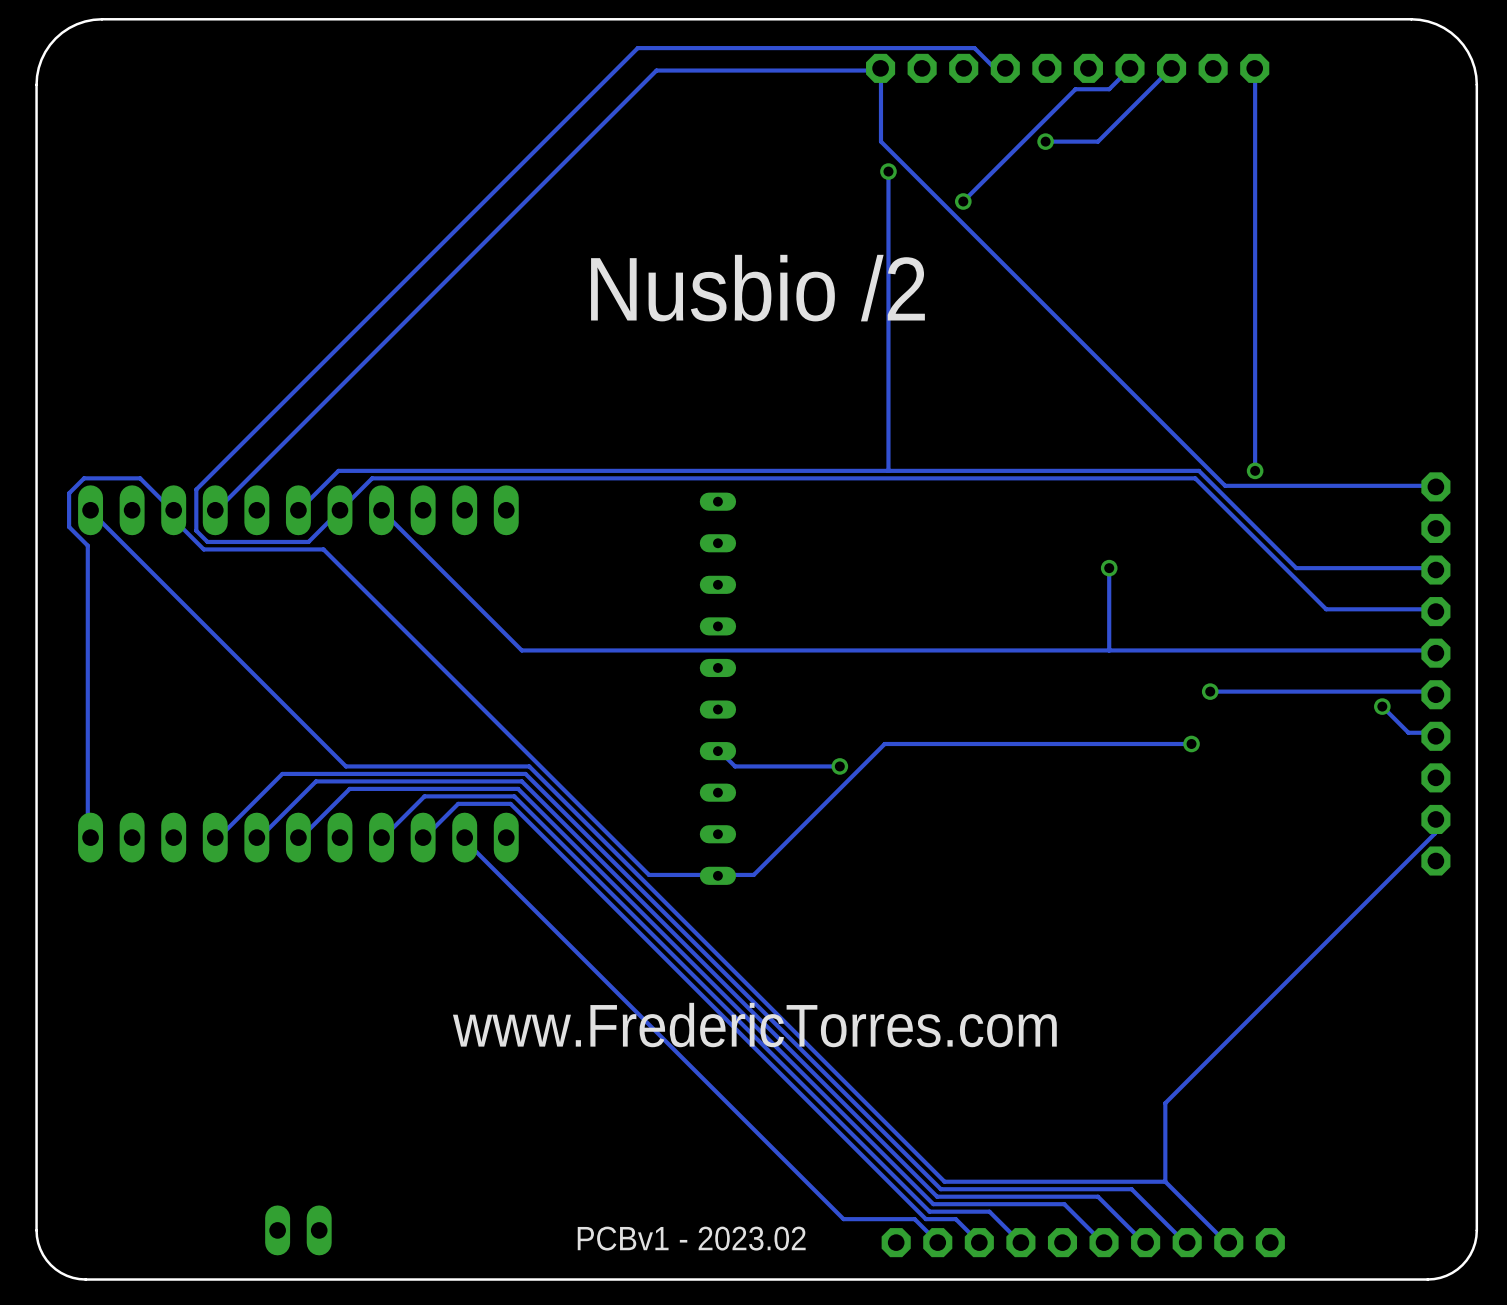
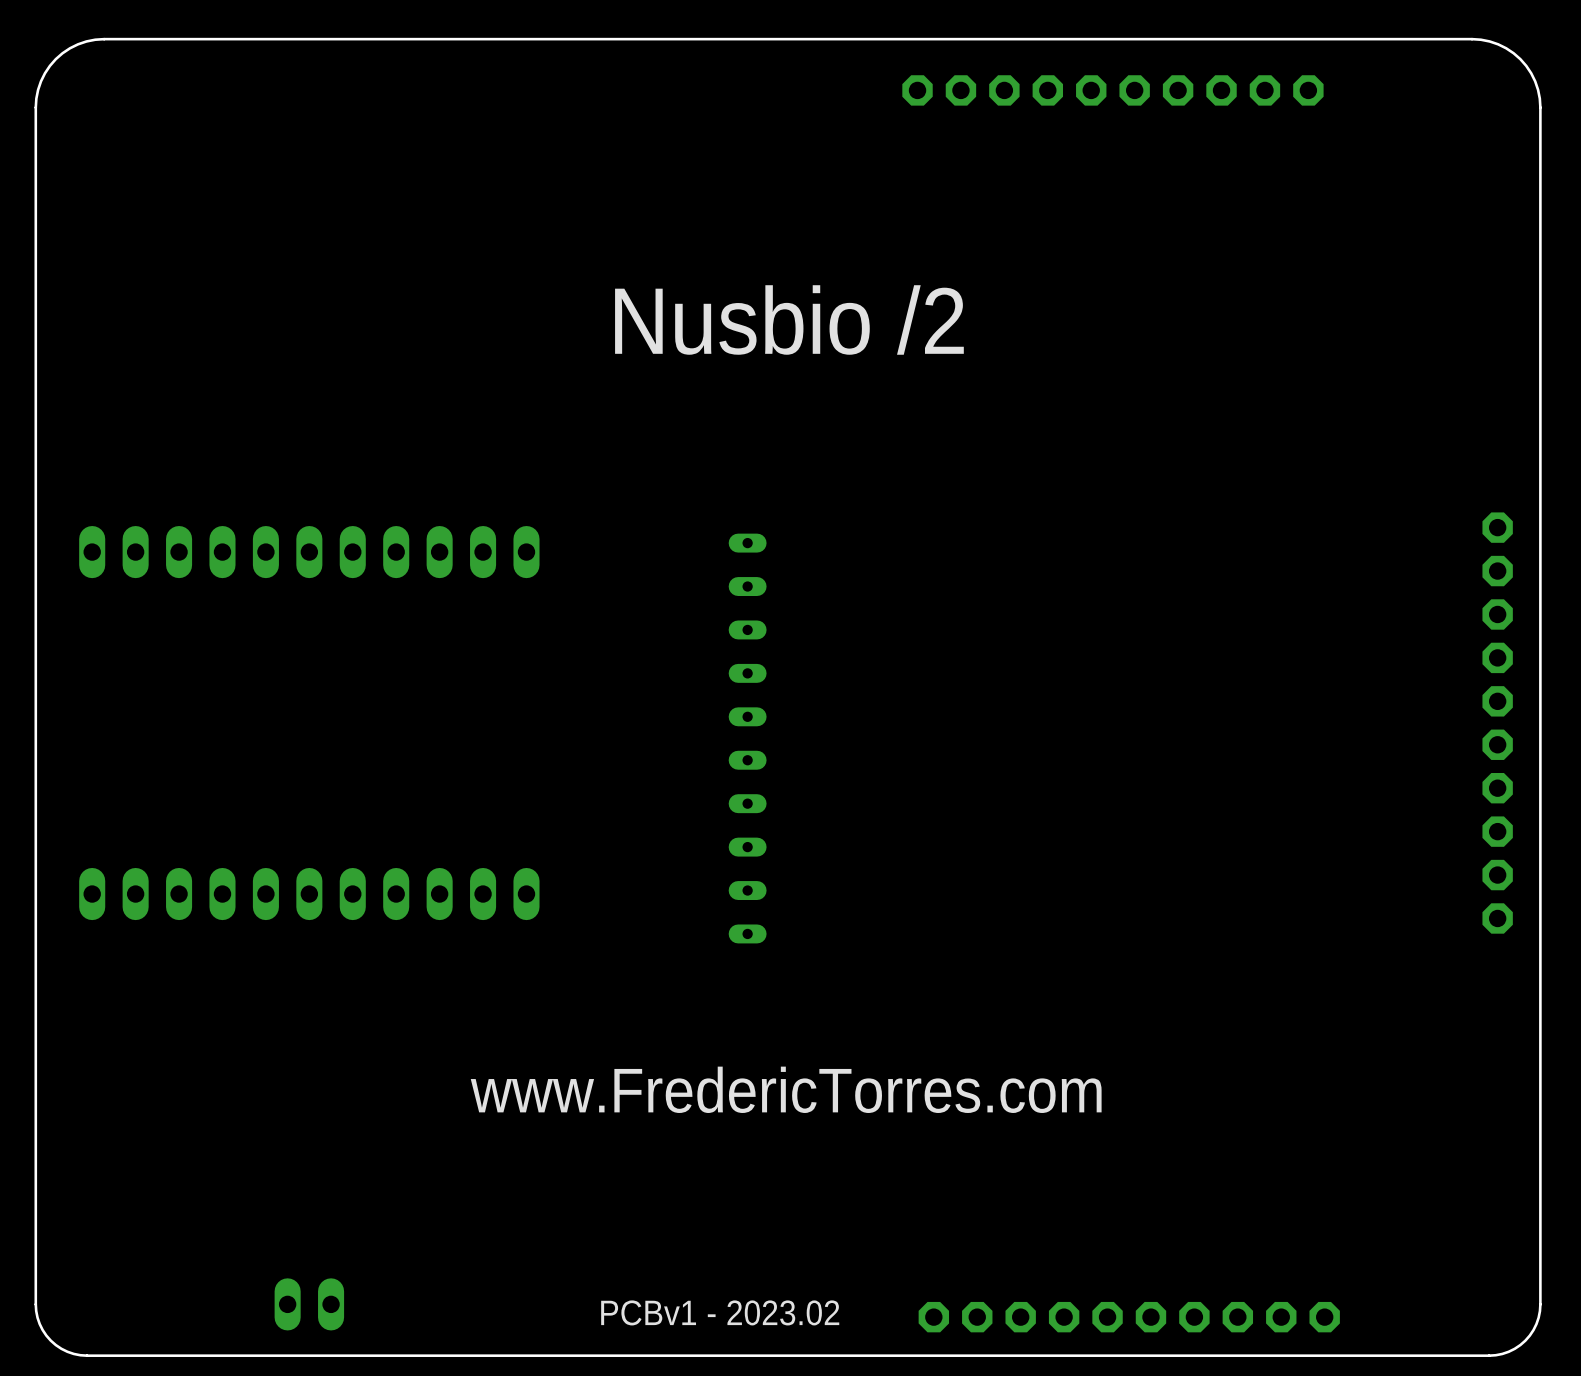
track: (1005, 68) (993, 66) (974, 48) (637, 48) (196, 489) (196, 530) (207, 541) (308, 541) (372, 478) (1195, 478) (1326, 609) (1434, 609) (1435, 611) -> none
track: (1130, 68) (1109, 89) (1075, 89) (963, 201) -> none
track: (1171, 68) (1097, 141) (1045, 141) -> none
track: (1254, 68) (1255, 470) -> none
via: (1045, 141) -> none
track: (888, 171) (888, 470) -> none
via: (888, 171) -> none
via: (963, 201) -> none
via: (1255, 470) -> none
track: (1435, 486) (1225, 485) (880, 141) (880, 68) (877, 70) (656, 70) (215, 510) -> none
track: (90, 510) (345, 766) (529, 766) (944, 1181) (1165, 1181) -> none
track: (298, 510) (338, 470) (1199, 470) (1296, 568) (1434, 568) (1435, 570) -> none
track: (381, 510) (521, 650) (1434, 650) (1435, 653) -> none
track: (1109, 568) (1109, 650) -> none
via: (1109, 568) -> none
track: (1210, 691) (1434, 691) (1435, 694) -> none
via: (1210, 691) -> none
track: (1382, 706) (1408, 732) (1434, 732) (1435, 736) -> none
via: (1382, 706) -> none
track: (1191, 743) (884, 743) (753, 874) (649, 874) (323, 549) (203, 549) (173, 519) (173, 510) (140, 478) (84, 478) (69, 493) (69, 526) (87, 545) (87, 837) (90, 837) -> none
via: (1191, 743) -> none
track: (717, 751) (735, 766) (839, 766) -> none
via: (839, 766) -> none
track: (1435, 819) (1434, 833) (1165, 1103) (1165, 1181) -> none
track: (215, 837) (218, 837) (282, 773) (525, 773) (940, 1189) (1131, 1189) (1187, 1242) -> none
track: (256, 837) (259, 837) (316, 781) (521, 781) (937, 1196) (1097, 1196) (1145, 1242) -> none
track: (298, 837) (301, 837) (349, 788) (518, 788) (933, 1204) (1064, 1204) (1104, 1242) -> none
track: (381, 837) (424, 796) (514, 796) (929, 1211) (989, 1211) (1020, 1242) -> none
track: (423, 837) (458, 803) (510, 803) (925, 1219) (955, 1219) (979, 1242) -> none
track: (464, 837) (465, 841) (843, 1219) (914, 1219) (937, 1242) -> none
track: (1165, 1181) (1225, 1241) (1228, 1242) -> none

